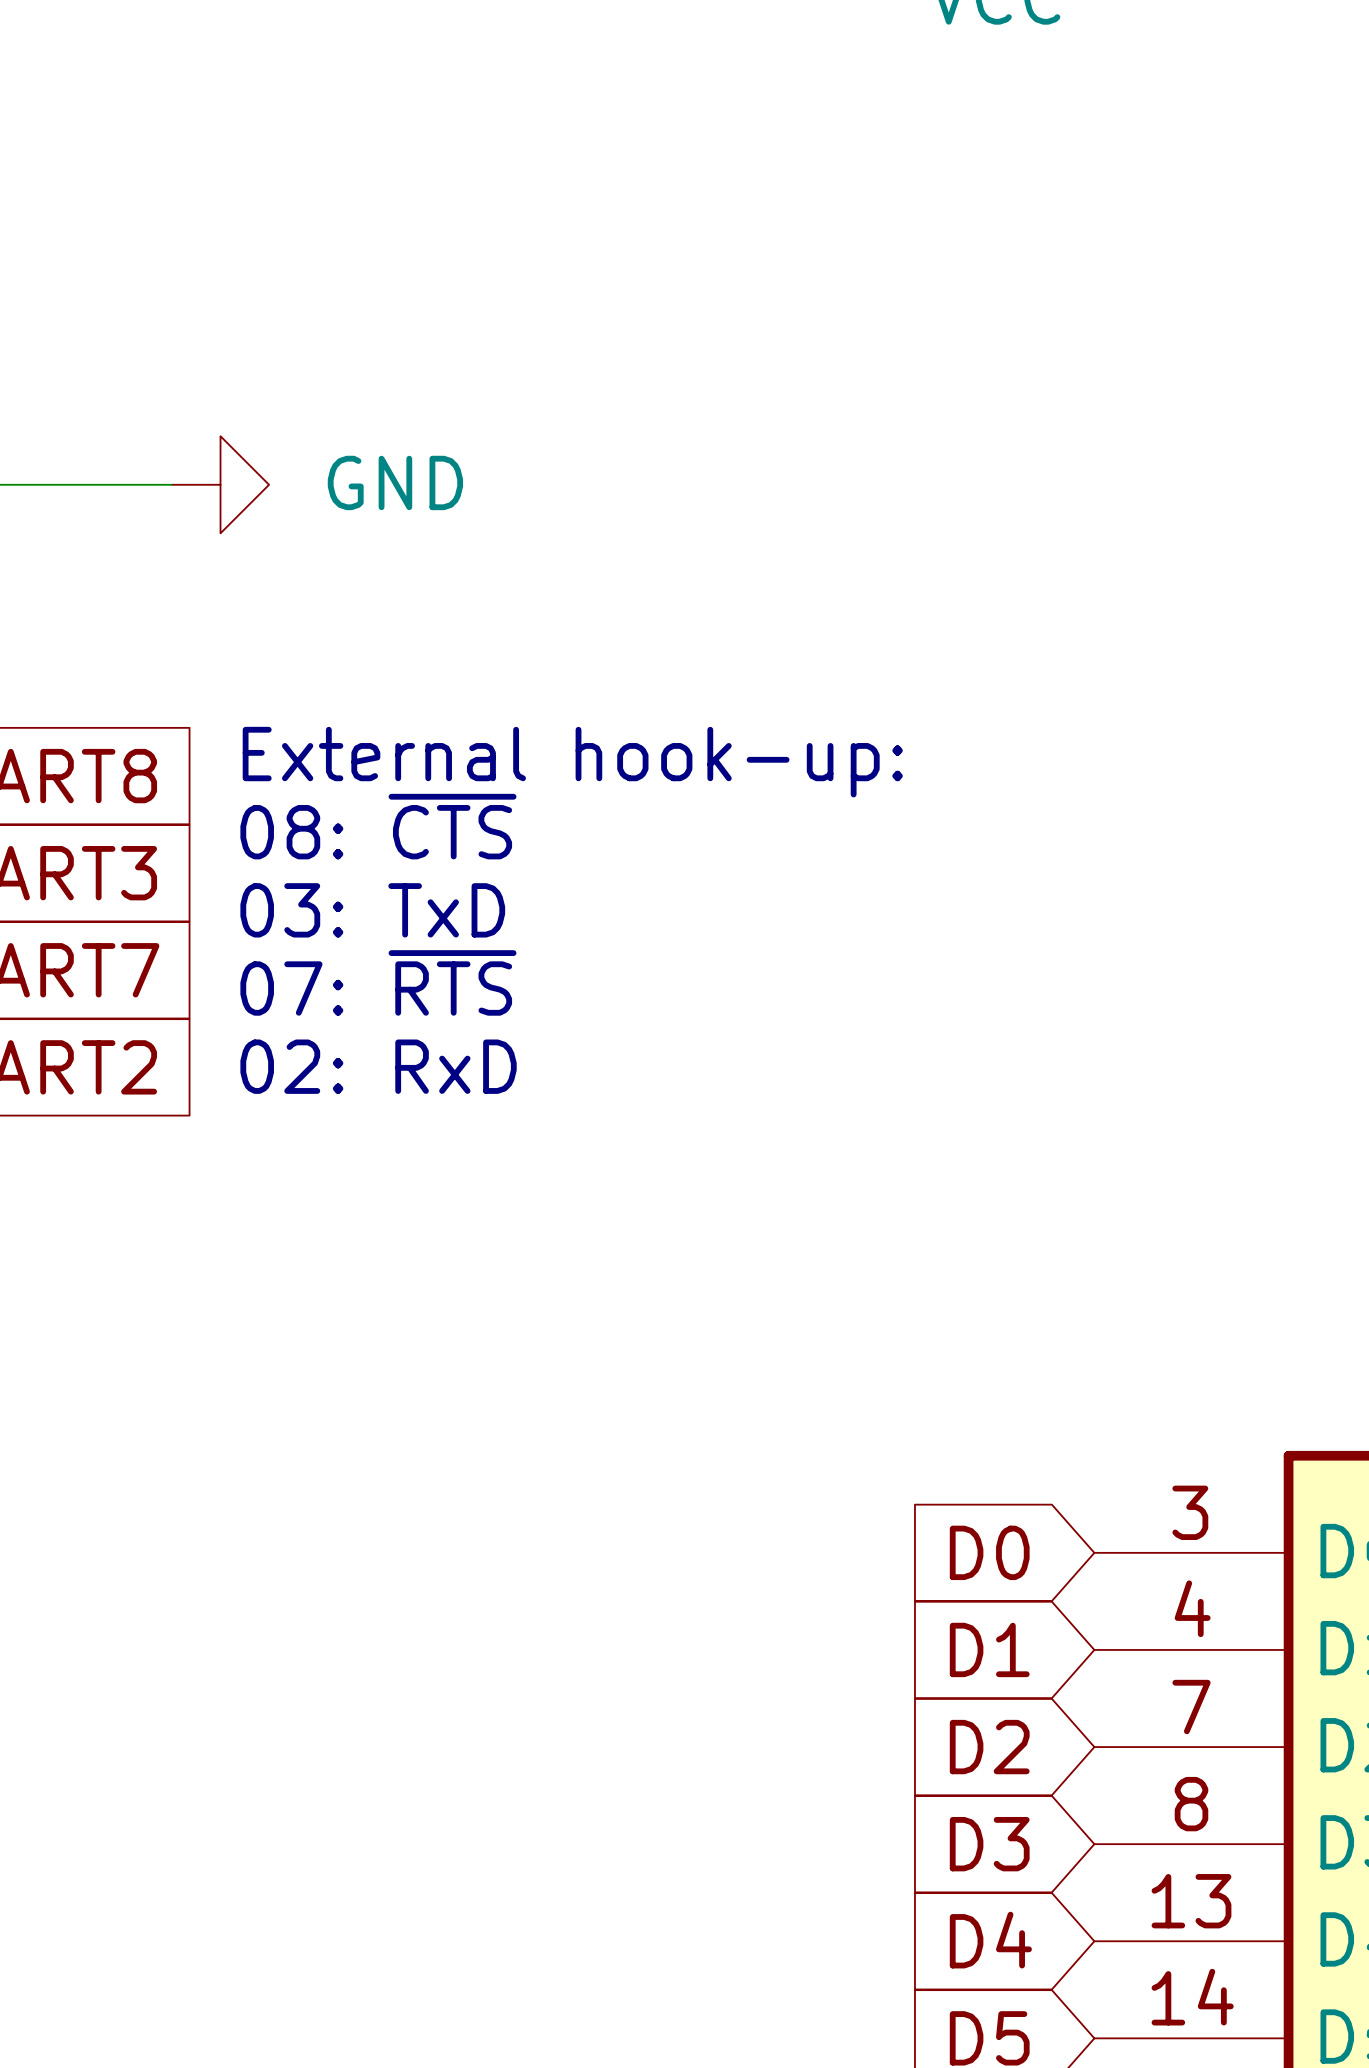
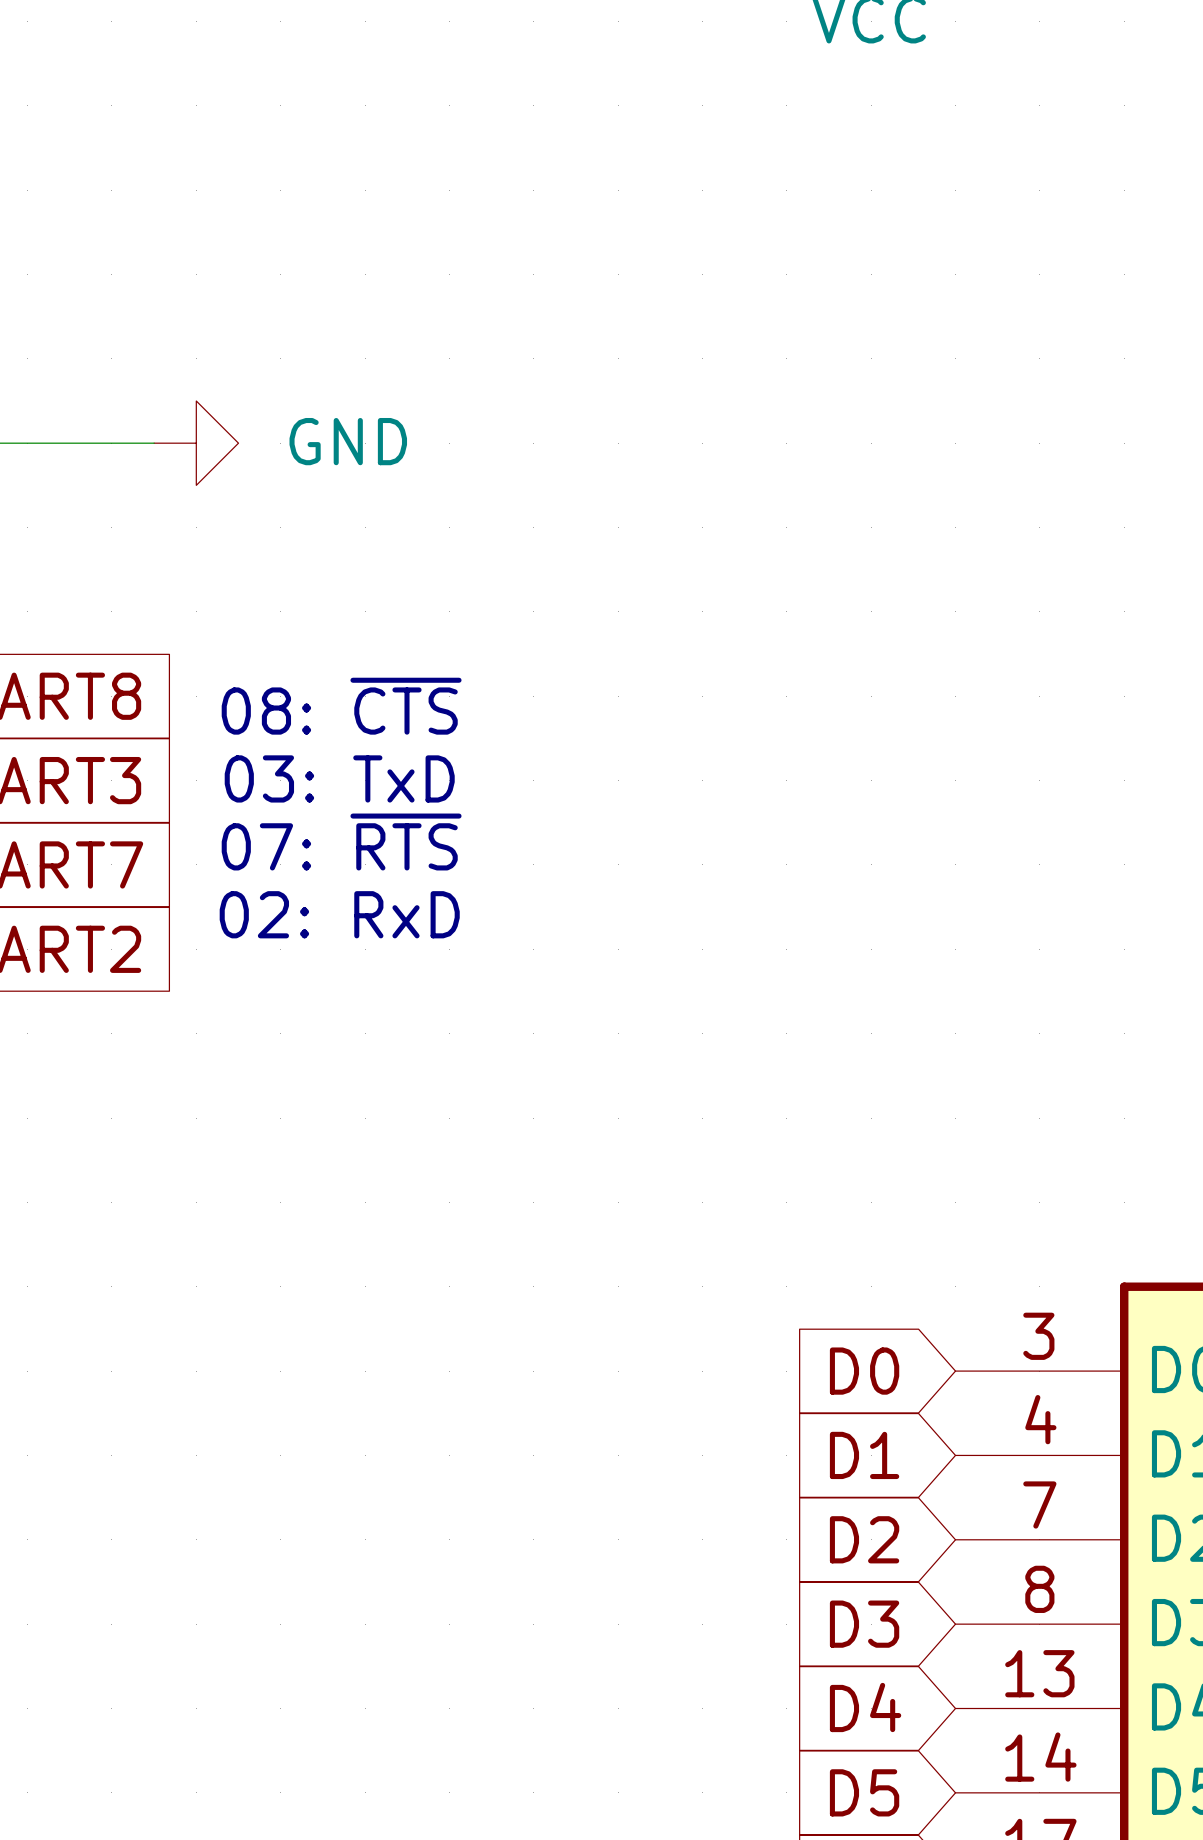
text: External hook-up: (572, 762) -> none
text position: 08: ~{CTS} (378, 826) -> 08: ~{CTS} (341, 706)
text position: 03: TxD (372, 910) -> 03: TxD (339, 778)
text position: 07: ~{RTS} (378, 982) -> 07: ~{RTS} (341, 842)
text position: 02: RxD (378, 1066) -> 02: RxD (339, 914)

